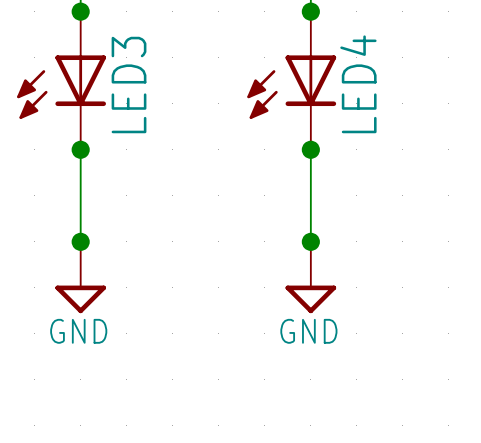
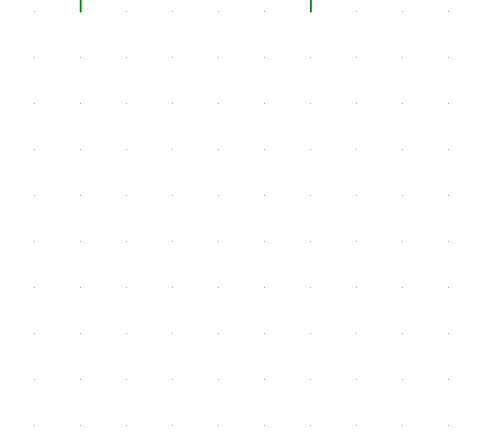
junction: (80, 11) -> none
junction: (310, 11) -> none
LED3: (61, 80) -> none
LED4: (291, 80) -> none
wire: (80, 149) (80, 241) -> none
junction: (80, 149) -> none
wire: (310, 149) (310, 241) -> none
junction: (310, 149) -> none
junction: (80, 241) -> none
junction: (310, 241) -> none
power symbol: GND (80, 277) -> none
power symbol: GND (310, 277) -> none

